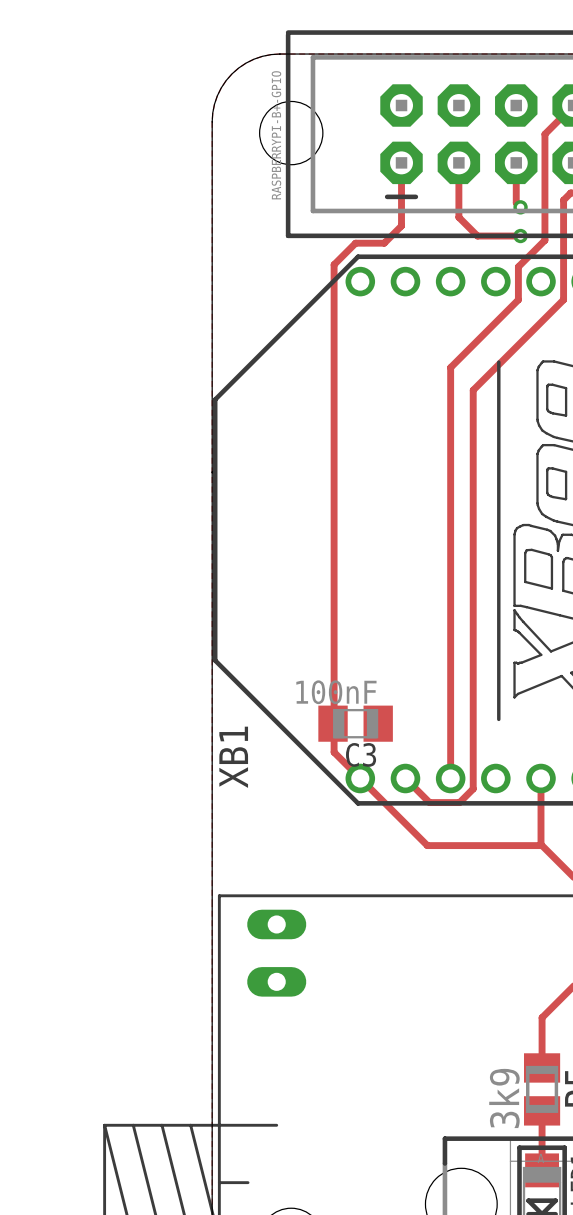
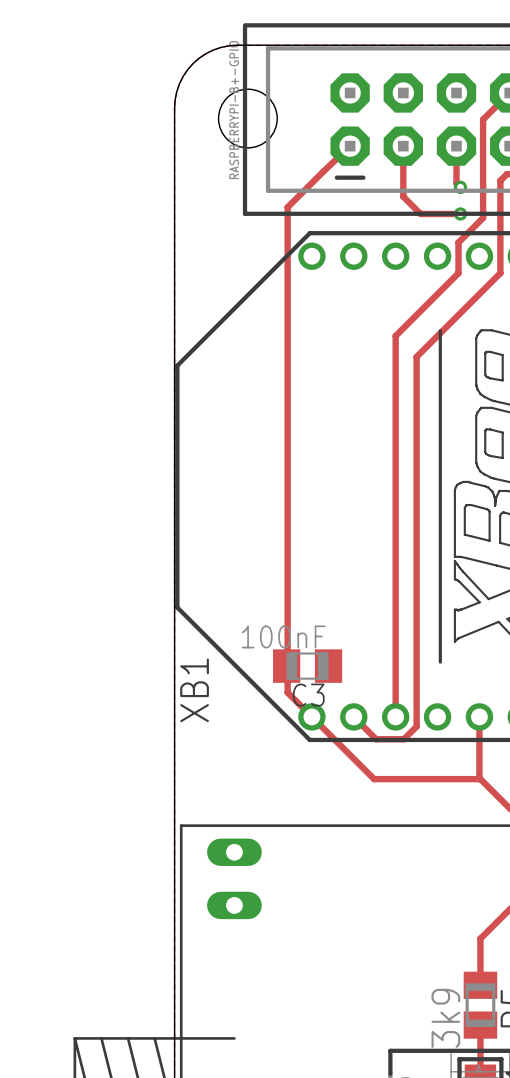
track: (401, 162) (401, 225) (384, 243) (355, 243) (334, 264) -> (350, 146) (287, 207) (287, 240)

